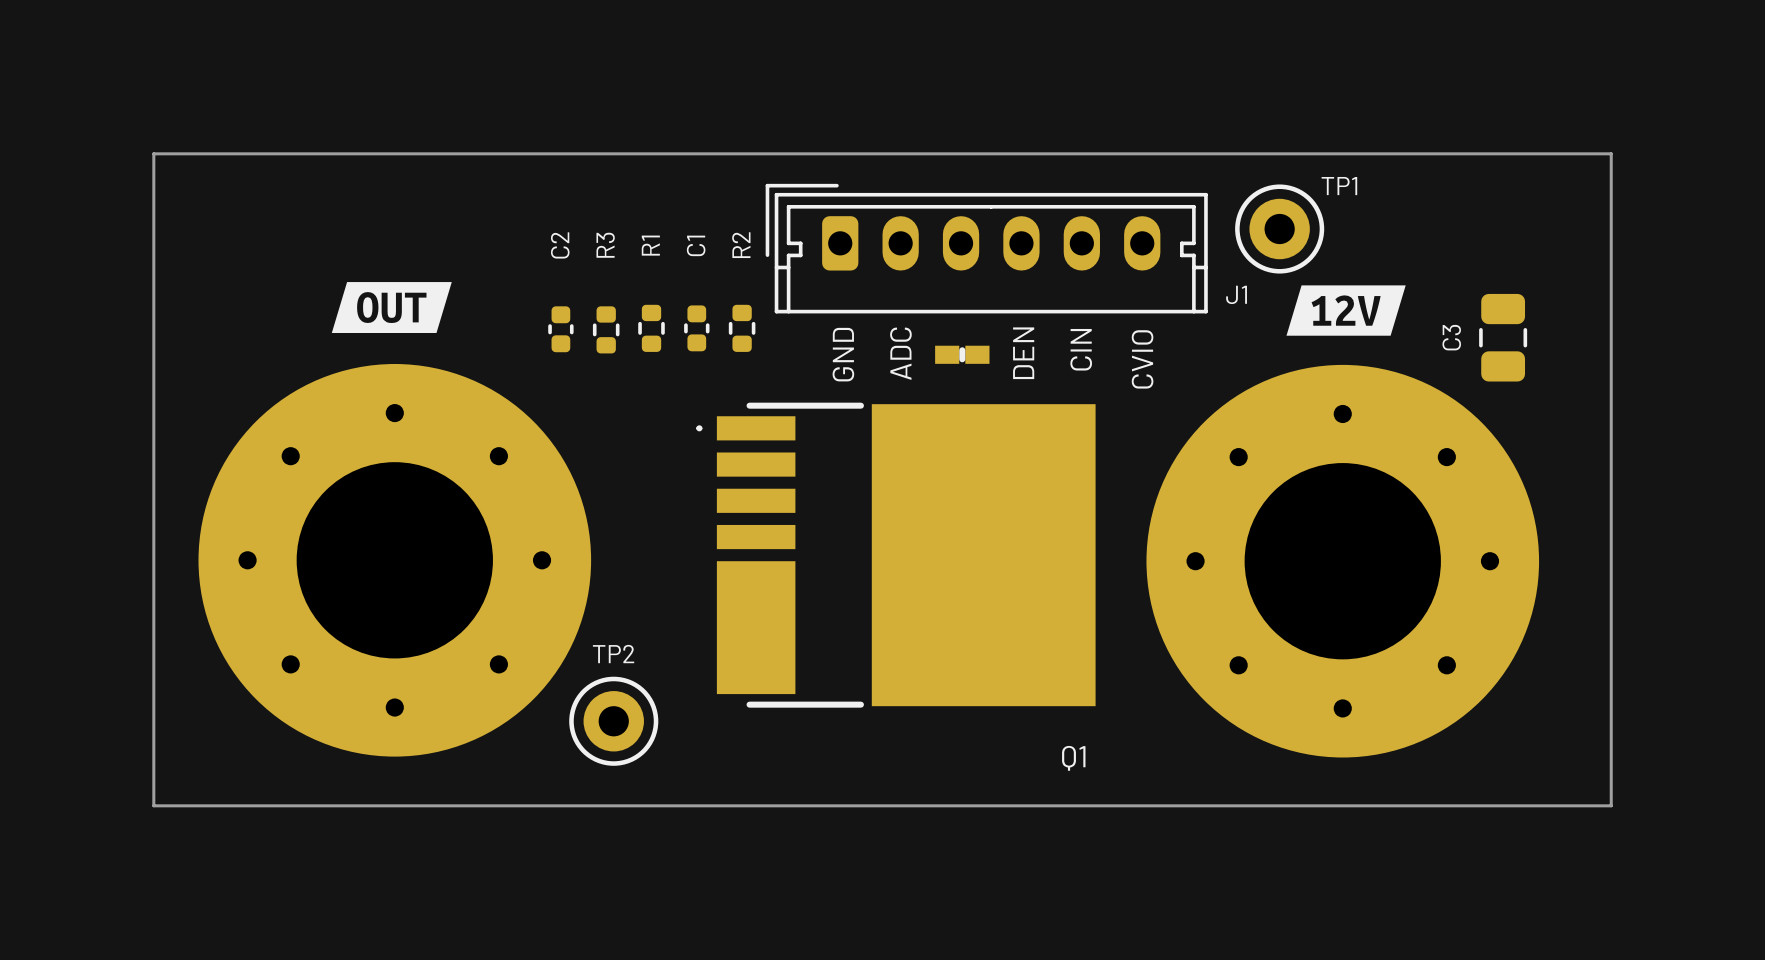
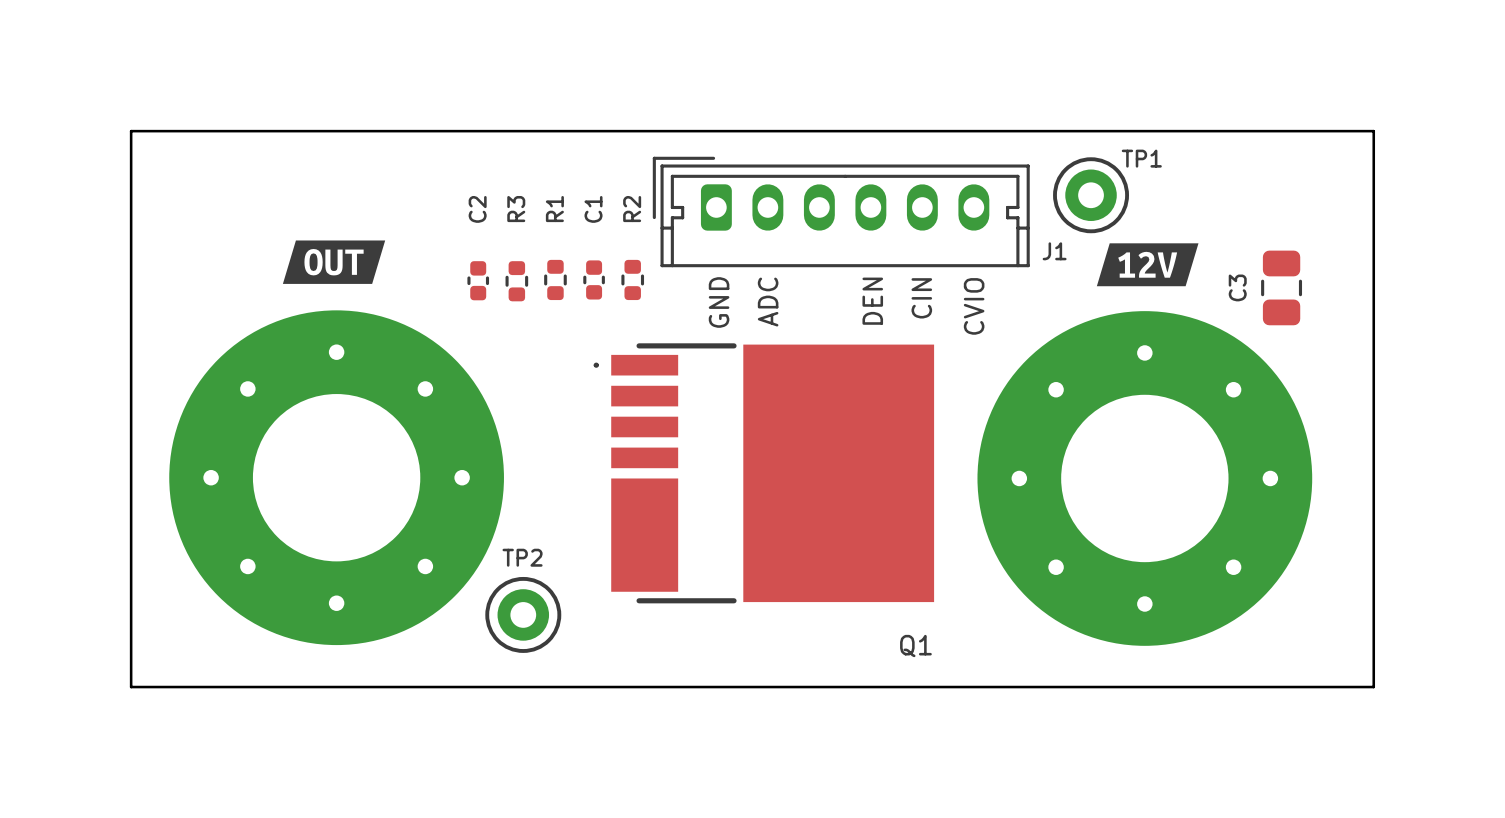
part: (962, 354) -> none

